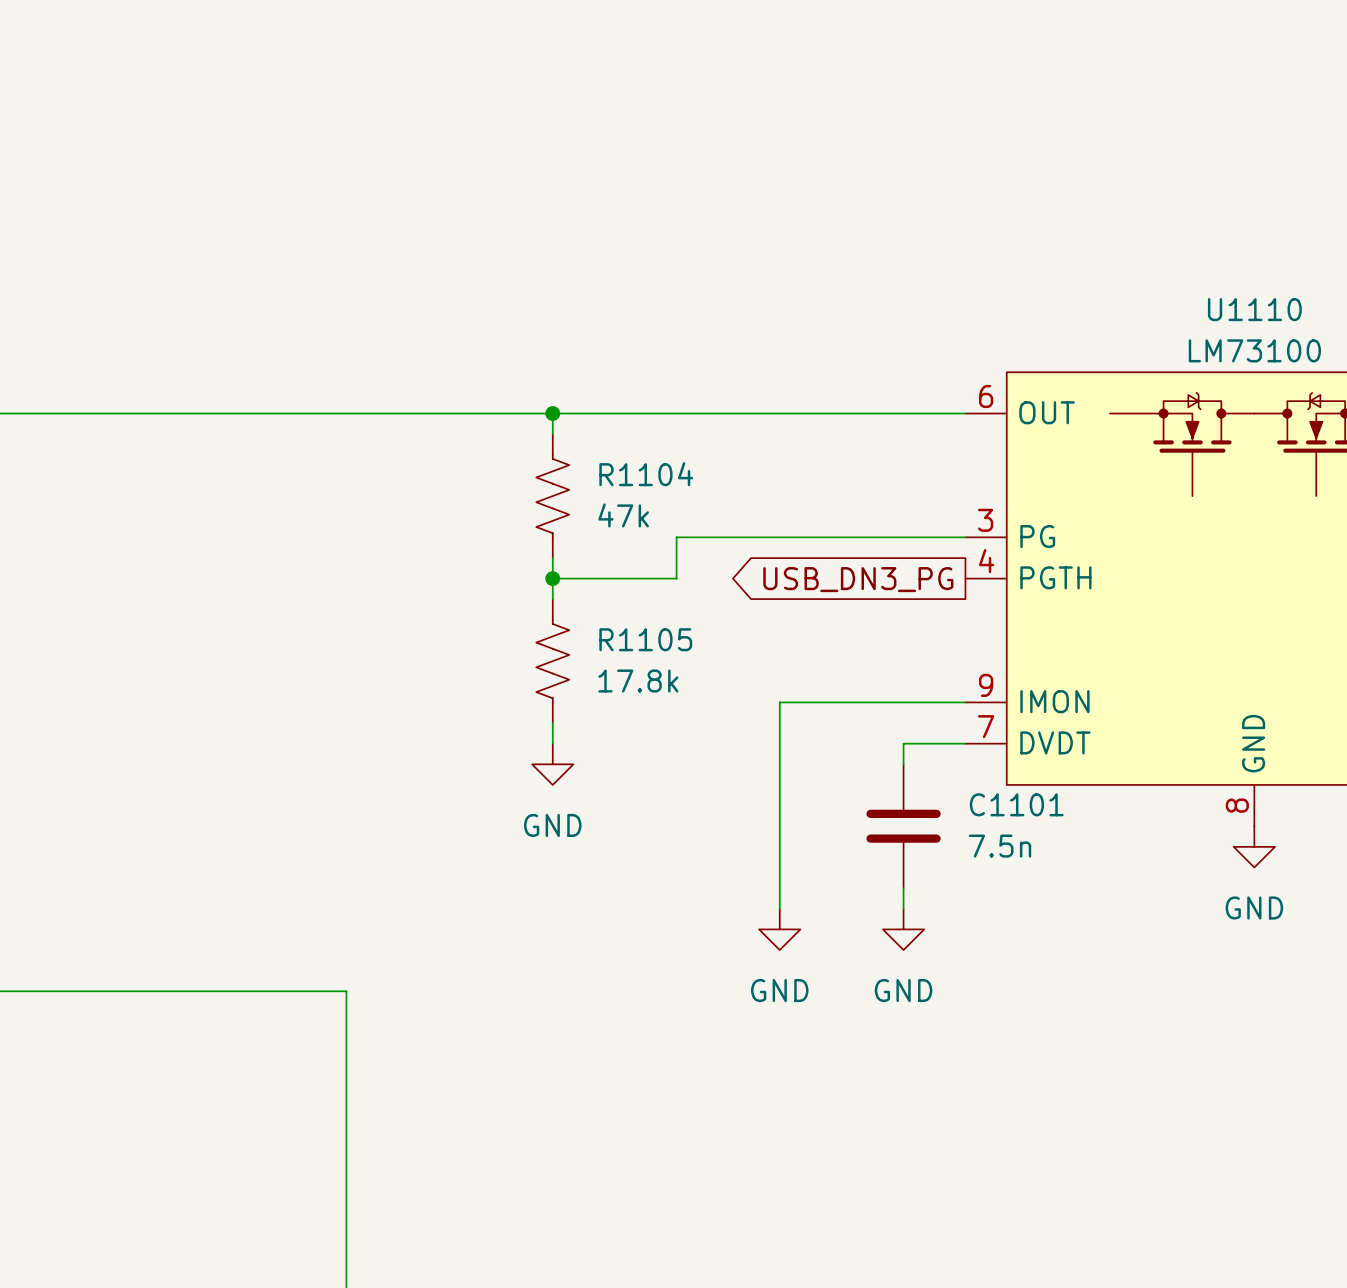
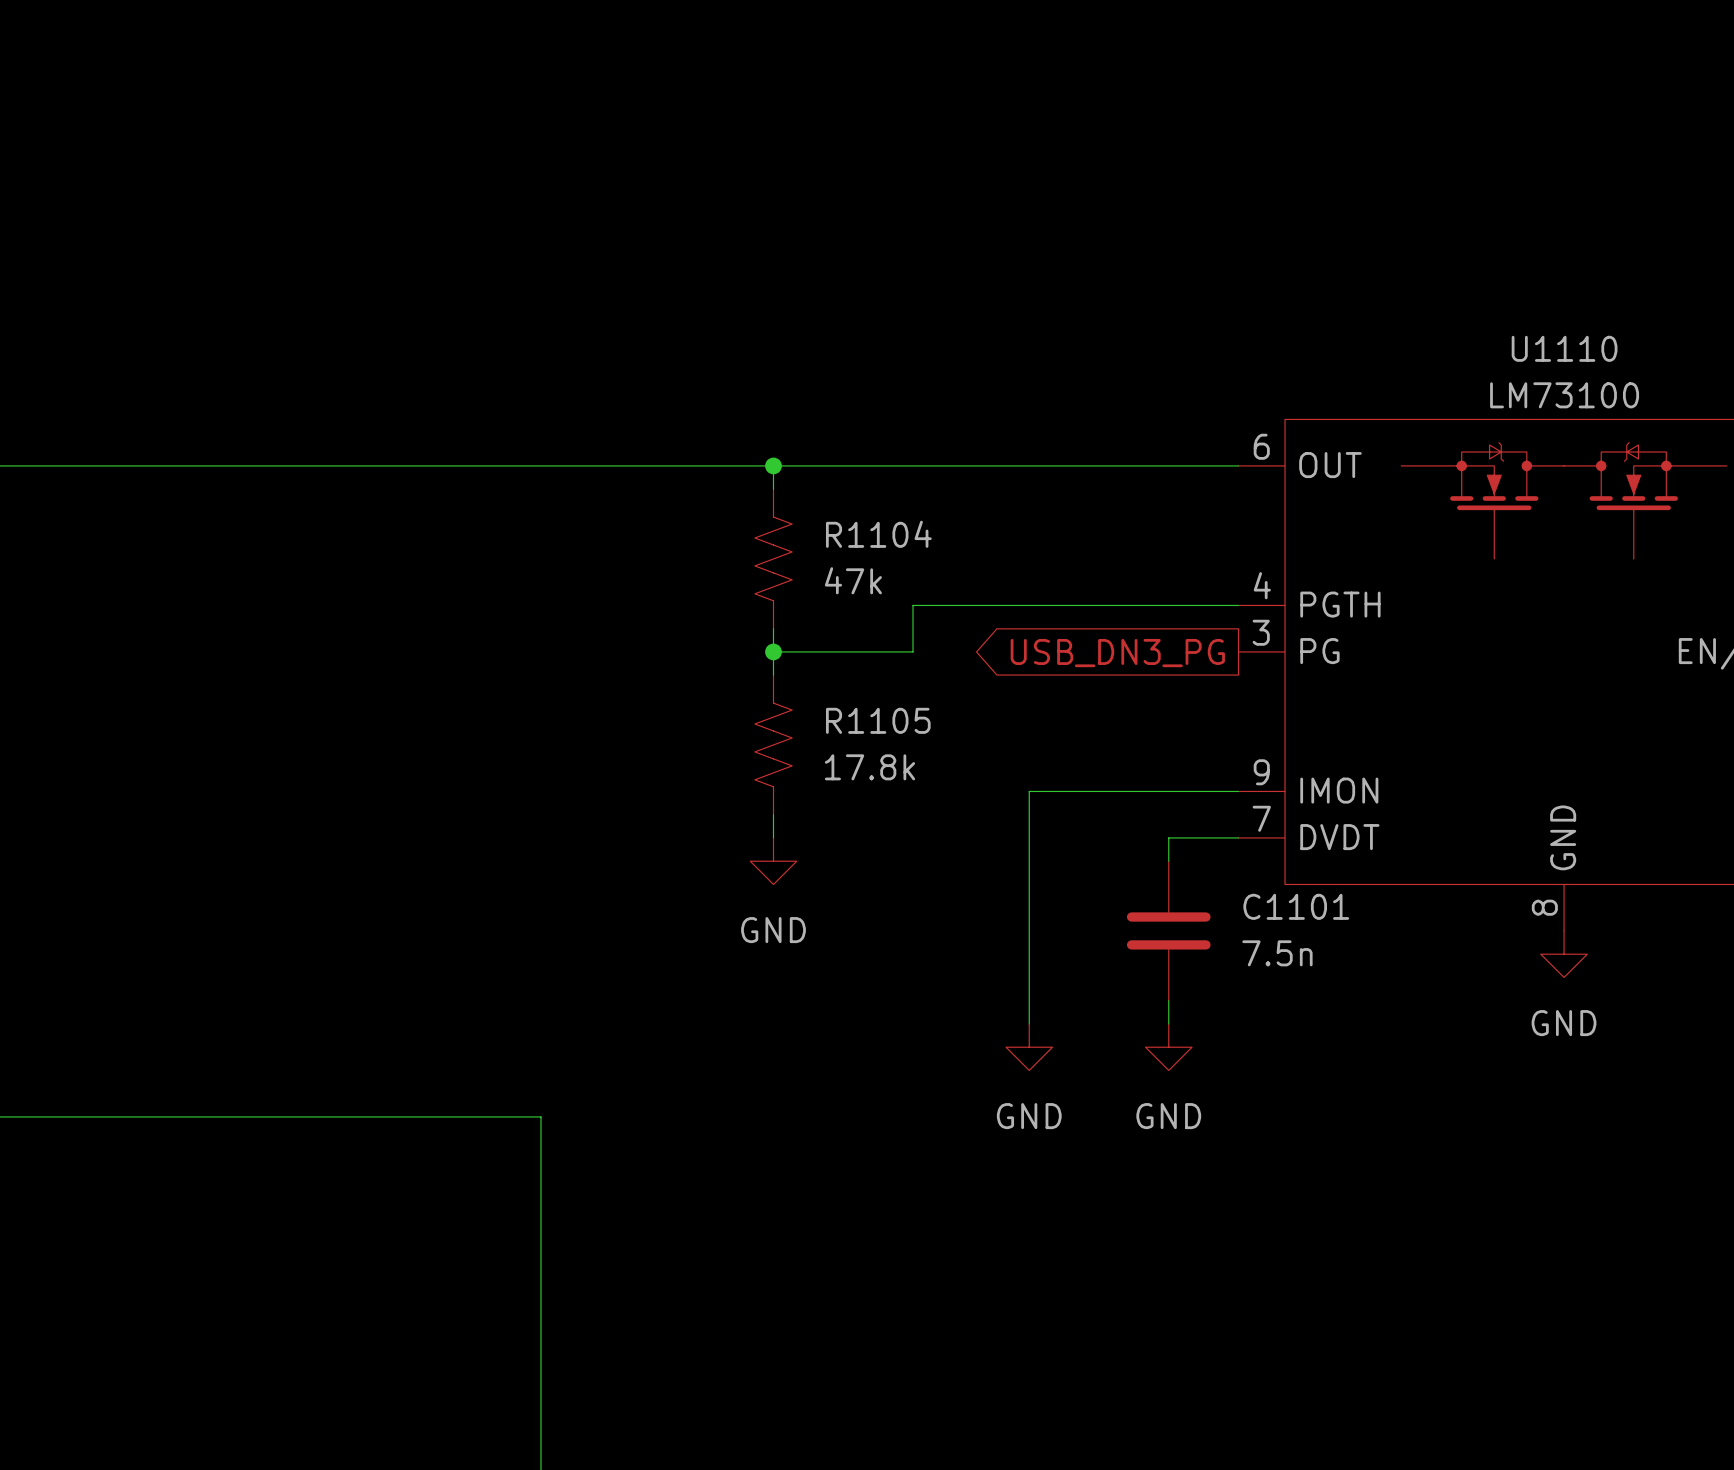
U1110 pin number: 3 (985, 520) -> 4 (1262, 585)
U1110 pin name: PG (1037, 536) -> PGTH (1340, 604)
U1110 pin number: 4 (986, 561) -> 3 (1261, 632)
U1110 pin name: PGTH (1055, 577) -> PG (1319, 651)

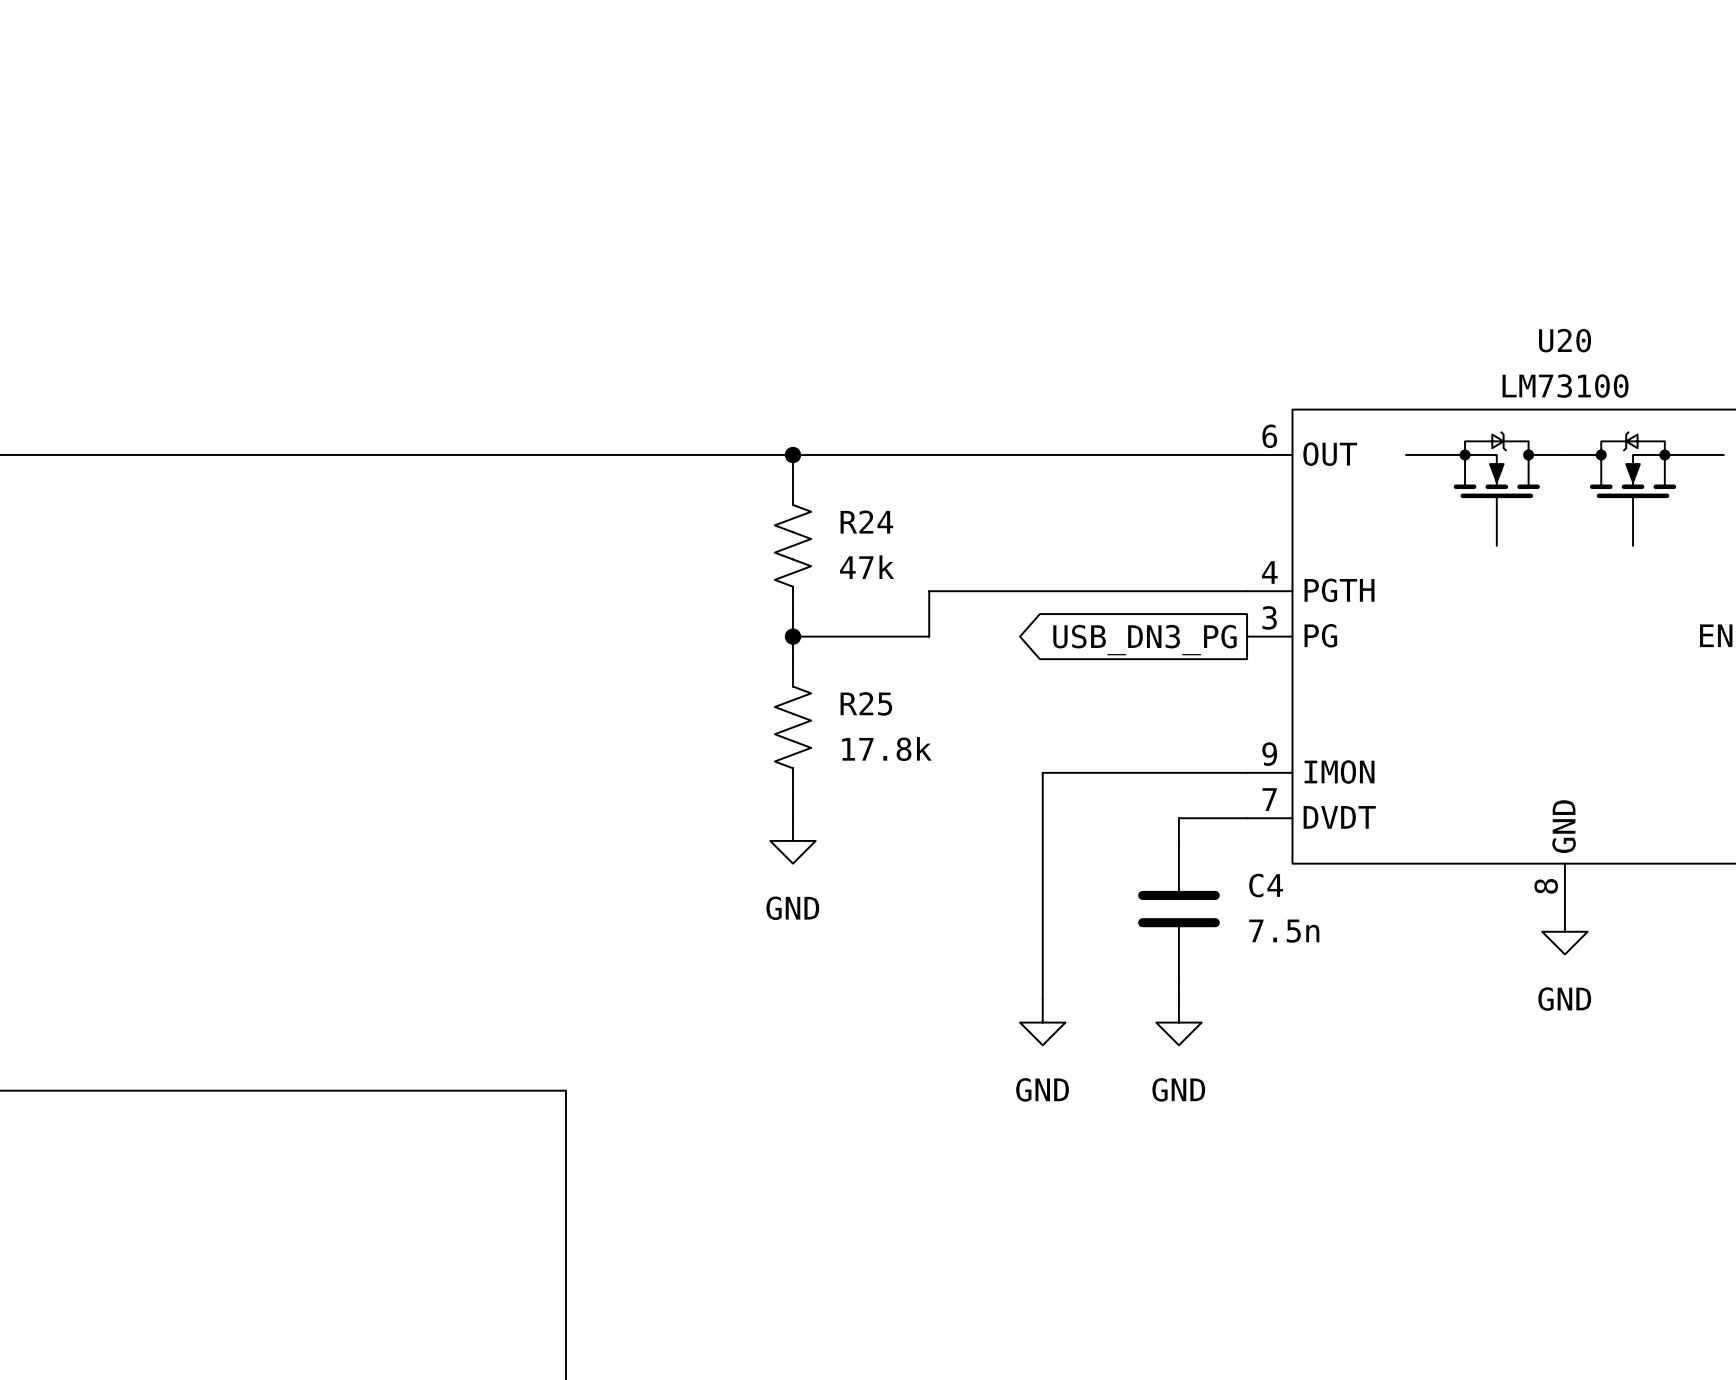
U1110 name: U1110 (1564, 348) -> U20 (1565, 340)
R1104 name: R1104 (878, 534) -> R24 (866, 522)
R1105 name: R1105 (878, 720) -> R25 (866, 703)
C1101 name: C1101 (1296, 906) -> C4 (1266, 885)

